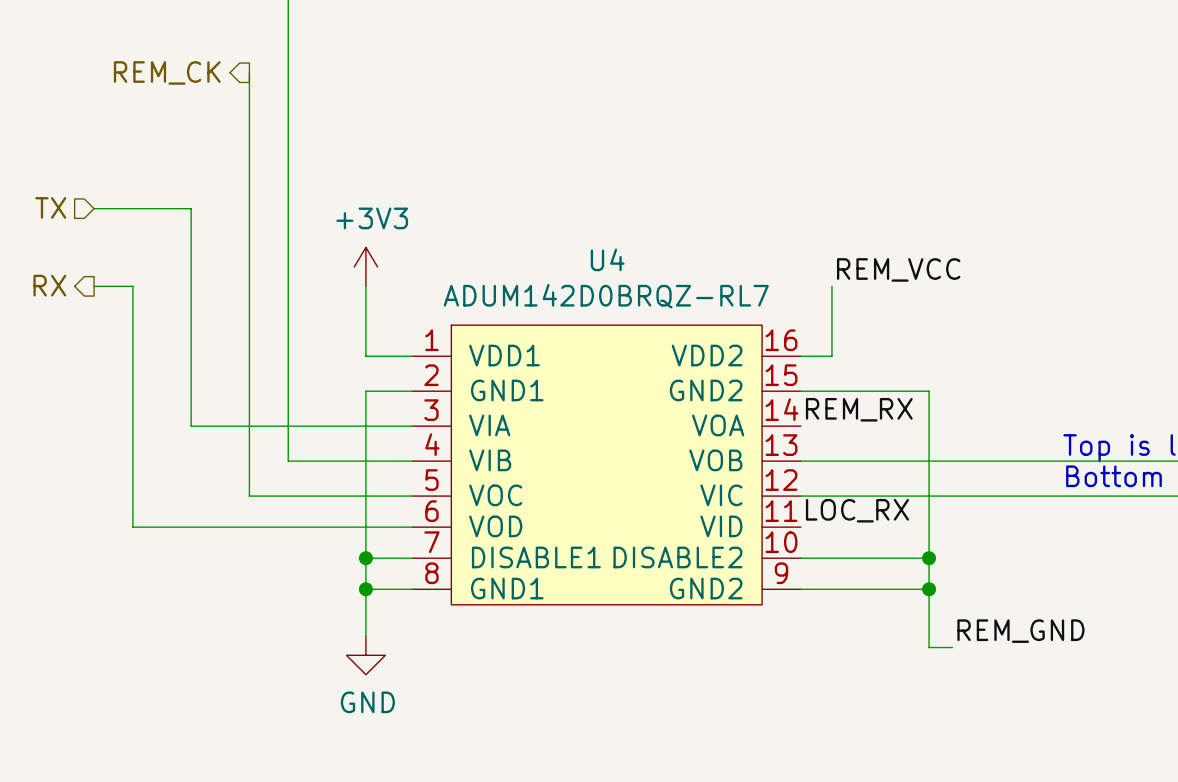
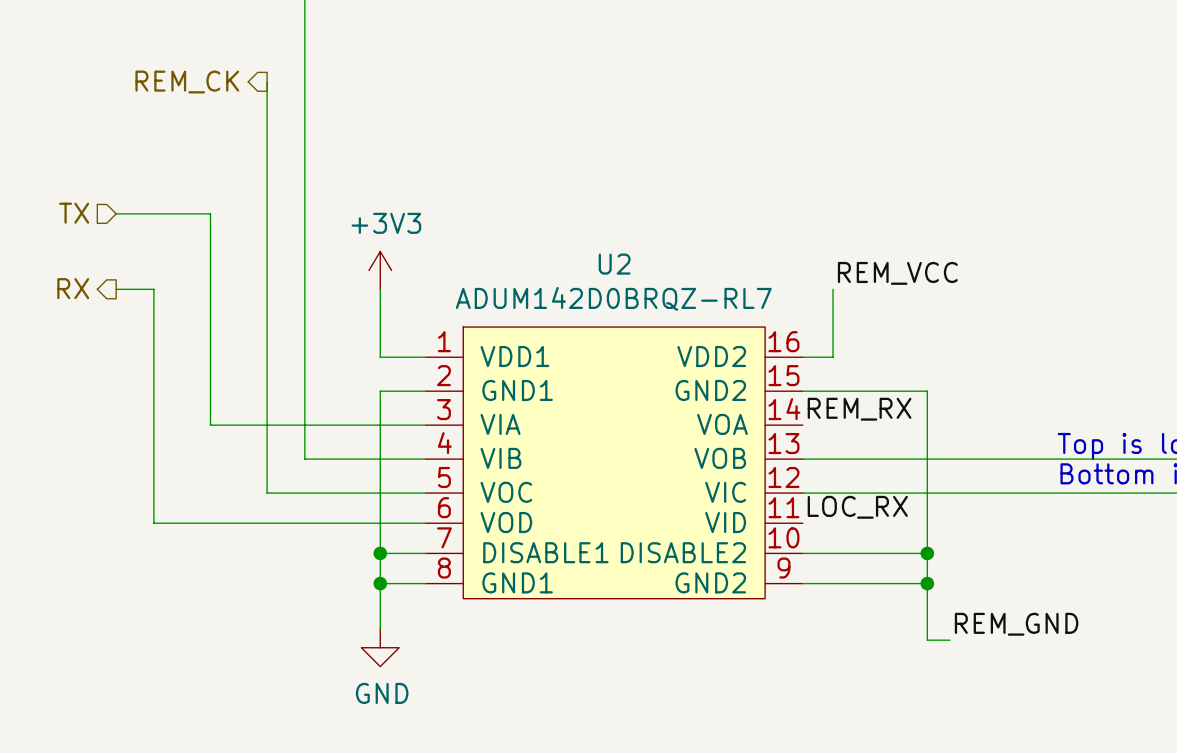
U4 name: U4 (607, 259) -> U2 (614, 264)

